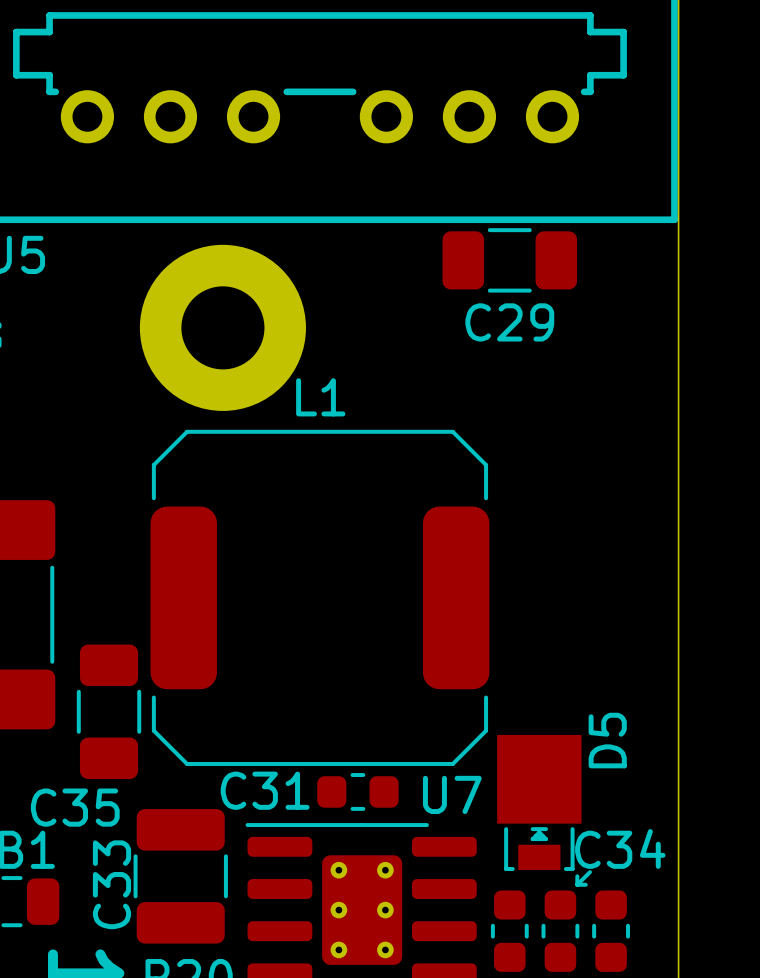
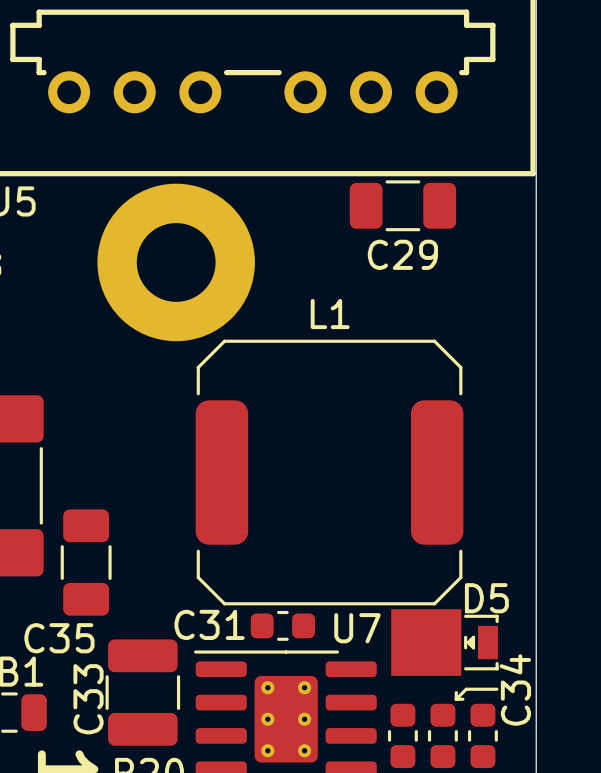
part footprint: [139, 244, 306, 411] -> [97, 183, 255, 342]
L1 position: (319, 597) -> (329, 472)
D5 rotation: 0° (539, 802) -> 90° counterclockwise (444, 642)
C34 name rotation: 0° (620, 848) -> 90° counterclockwise (515, 689)
line: none -> (466, 689) (496, 689)

